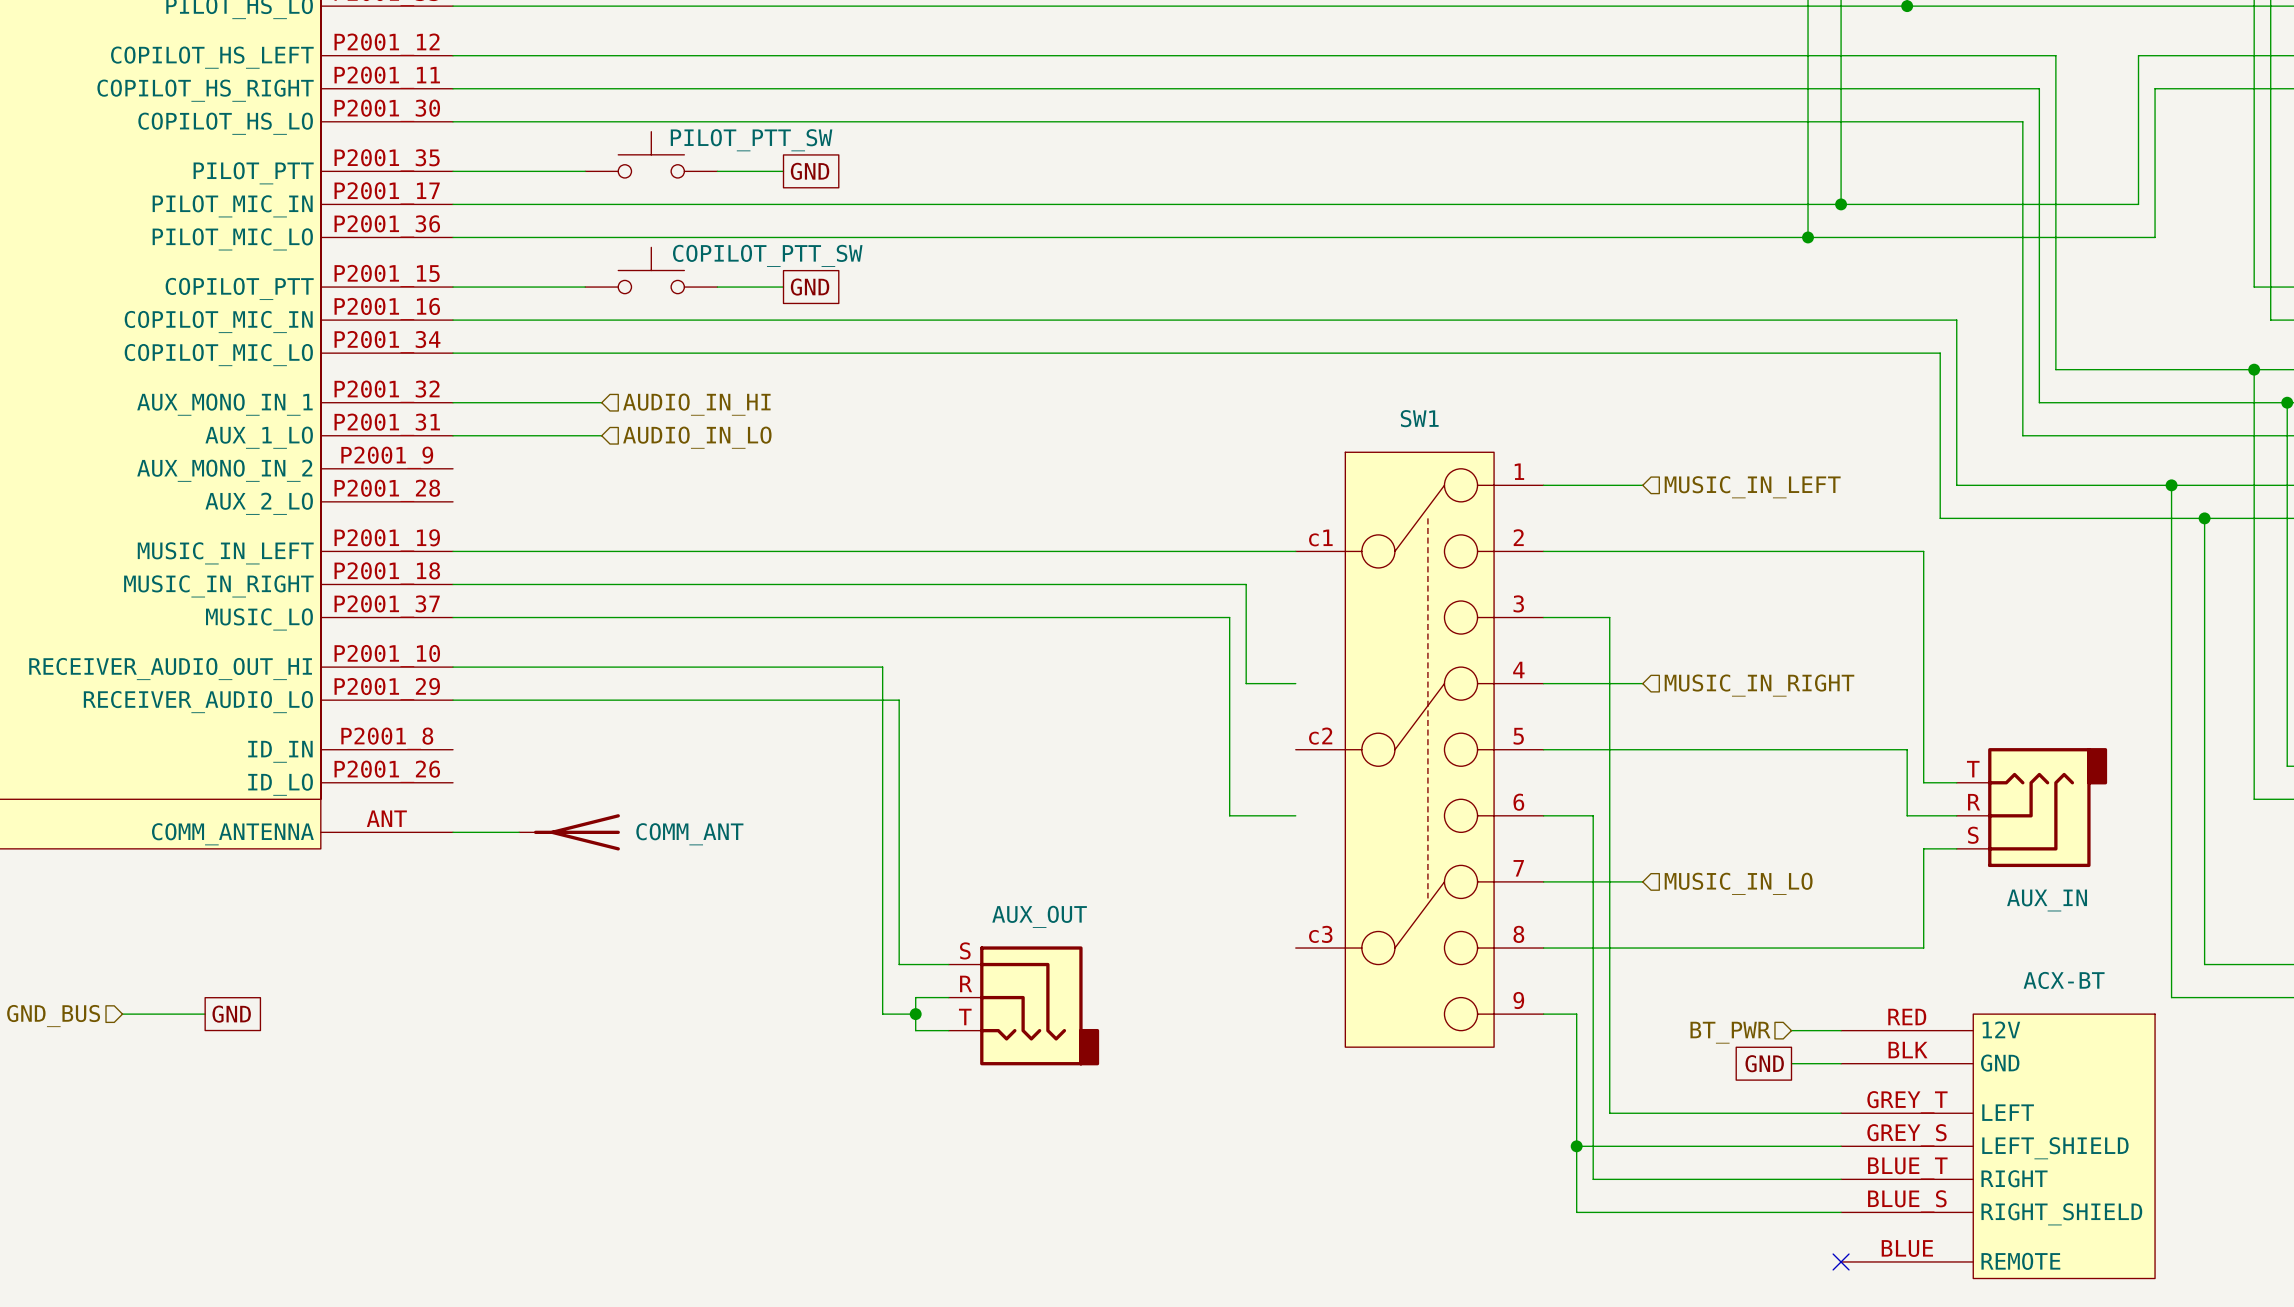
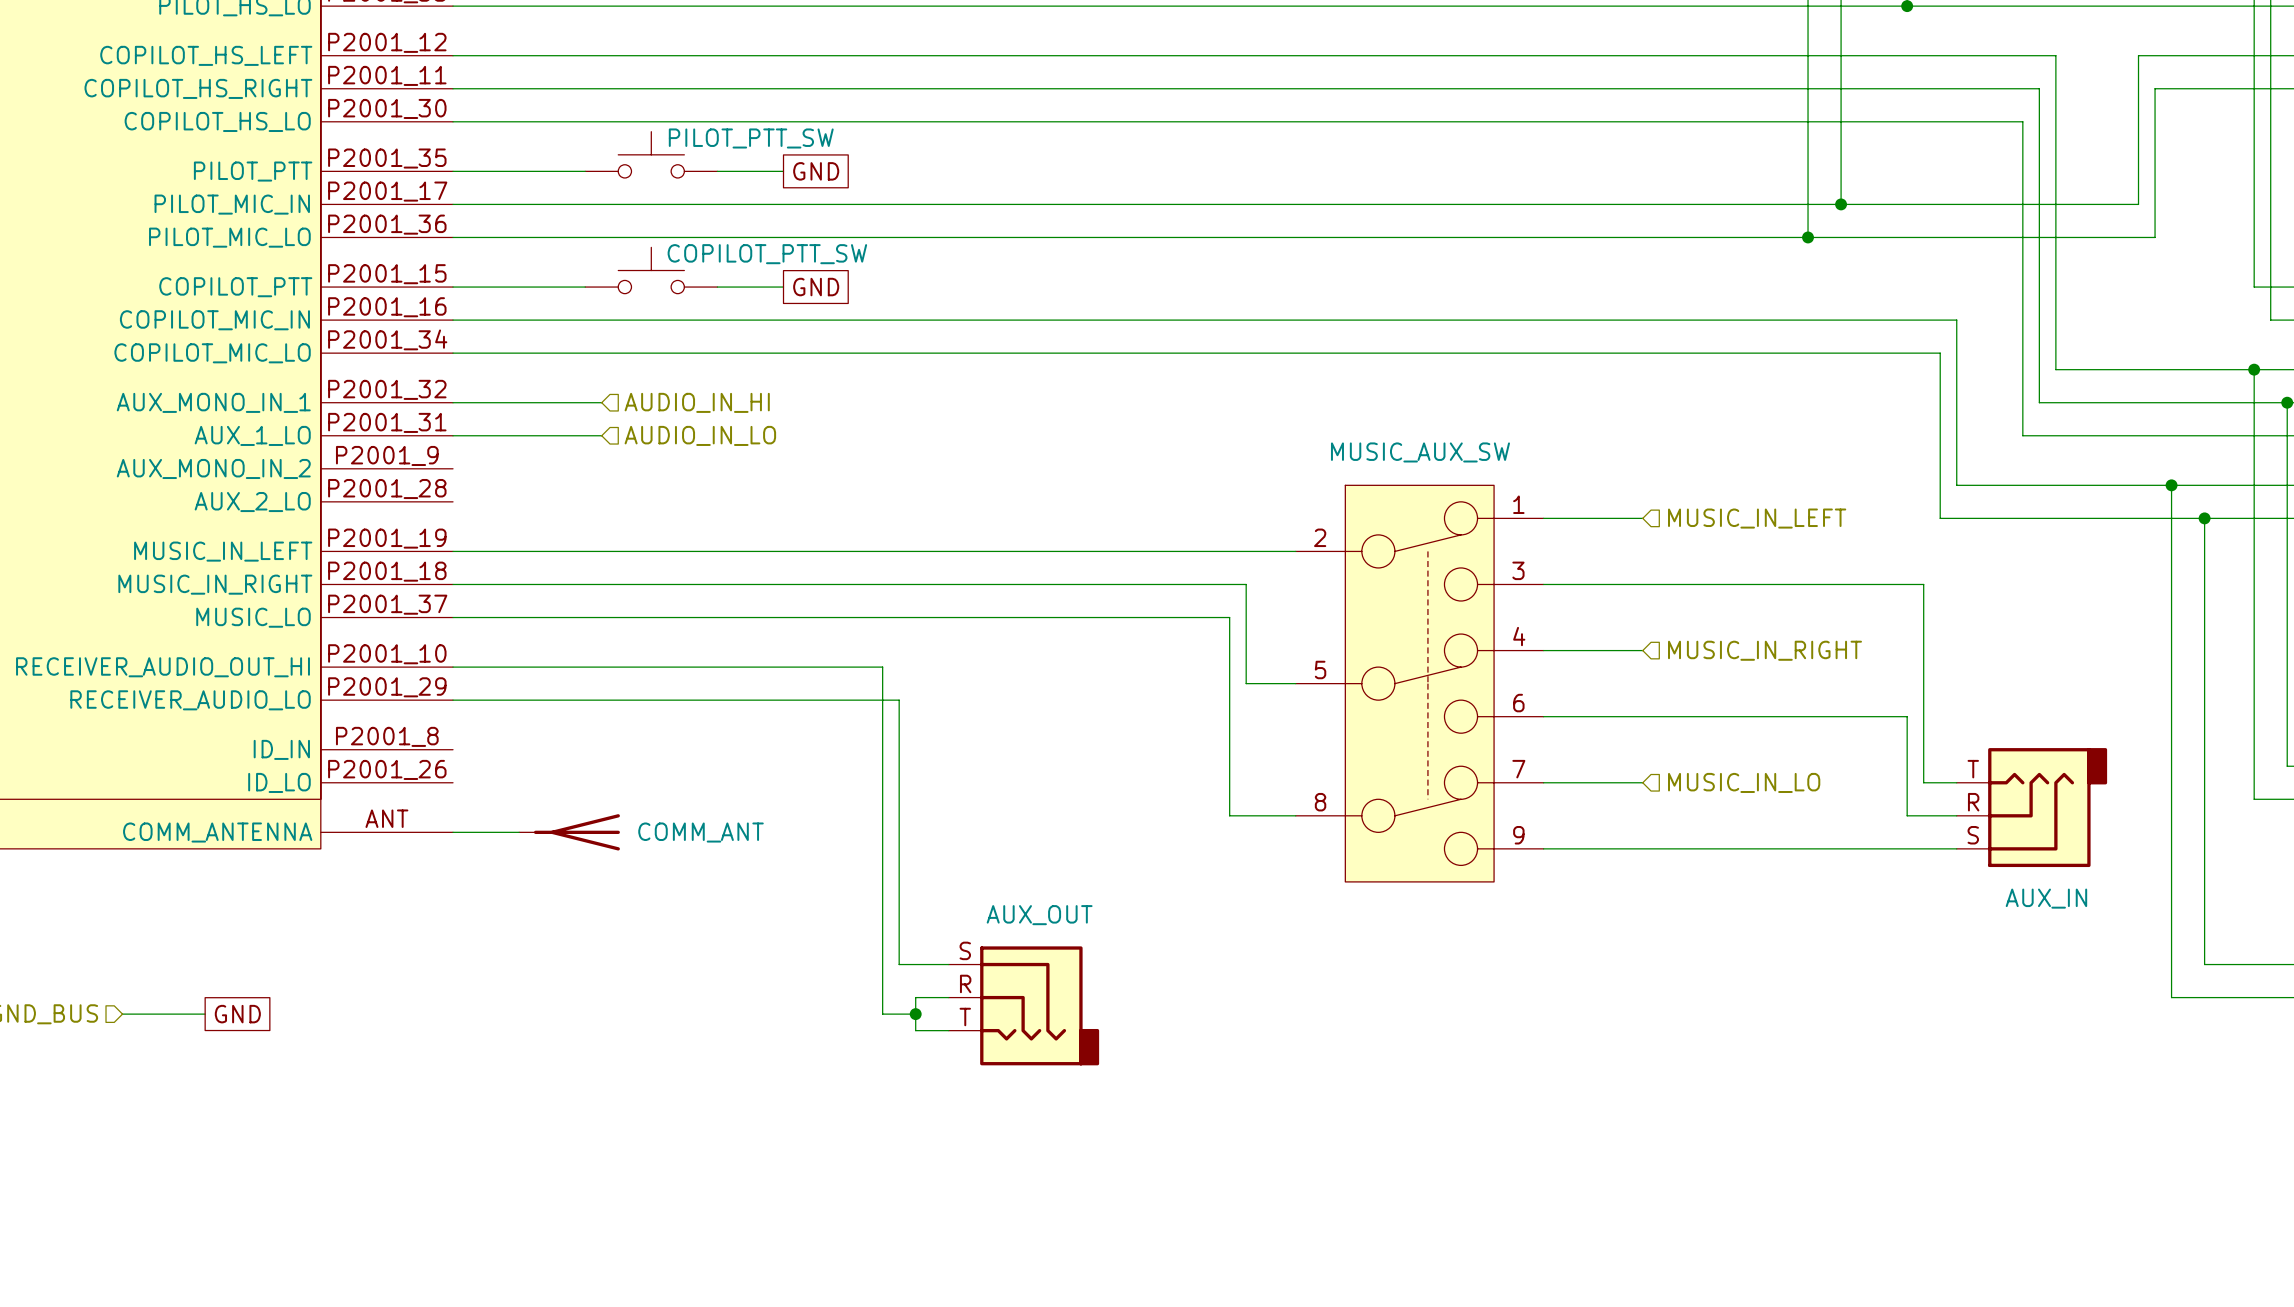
wire: (1543, 485) (1642, 485) -> (1543, 518) (1642, 518)
hierarchical label position: MUSIC_IN_LEFT (1752, 487) -> MUSIC_IN_LEFT (1757, 518)
wire: (1543, 551) (1923, 551) (1923, 584) -> (1543, 584) (1923, 584)
wire: (1543, 617) (1609, 617) (1609, 1113) (1841, 1113) -> none
MUSIC_AUX_SW: none -> (1419, 683)
wire: (1543, 683) (1642, 683) -> (1543, 650) (1642, 650)
hierarchical label position: MUSIC_IN_RIGHT (1759, 685) -> MUSIC_IN_RIGHT (1765, 650)
SW1: (1419, 749) -> none
wire: (1543, 749) (1907, 749) -> (1543, 716) (1907, 716) (1907, 749)
wire: (1543, 815) (1593, 815) (1593, 1179) (1841, 1179) -> none
wire: (1923, 848) (1923, 948) (1543, 948) -> (1923, 848) (1543, 848)
wire: (1543, 881) (1642, 881) -> (1543, 782) (1642, 782)
hierarchical label position: MUSIC_IN_LO (1738, 883) -> MUSIC_IN_LO (1744, 782)
wire: (1543, 1014) (1576, 1014) (1576, 1212) (1841, 1212) -> none
wire: (1791, 1030) (1841, 1030) -> none
hierarchical label: BT_PWR (1730, 1032) -> none
global label: GND (1764, 1063) -> none
wire: (1791, 1063) (1841, 1063) -> none
wire: (1576, 1146) (1841, 1146) -> none
junction: (1576, 1146) -> none
ACX-BT: (1998, 1146) -> none
no-connect mark: (1841, 1261) -> none

